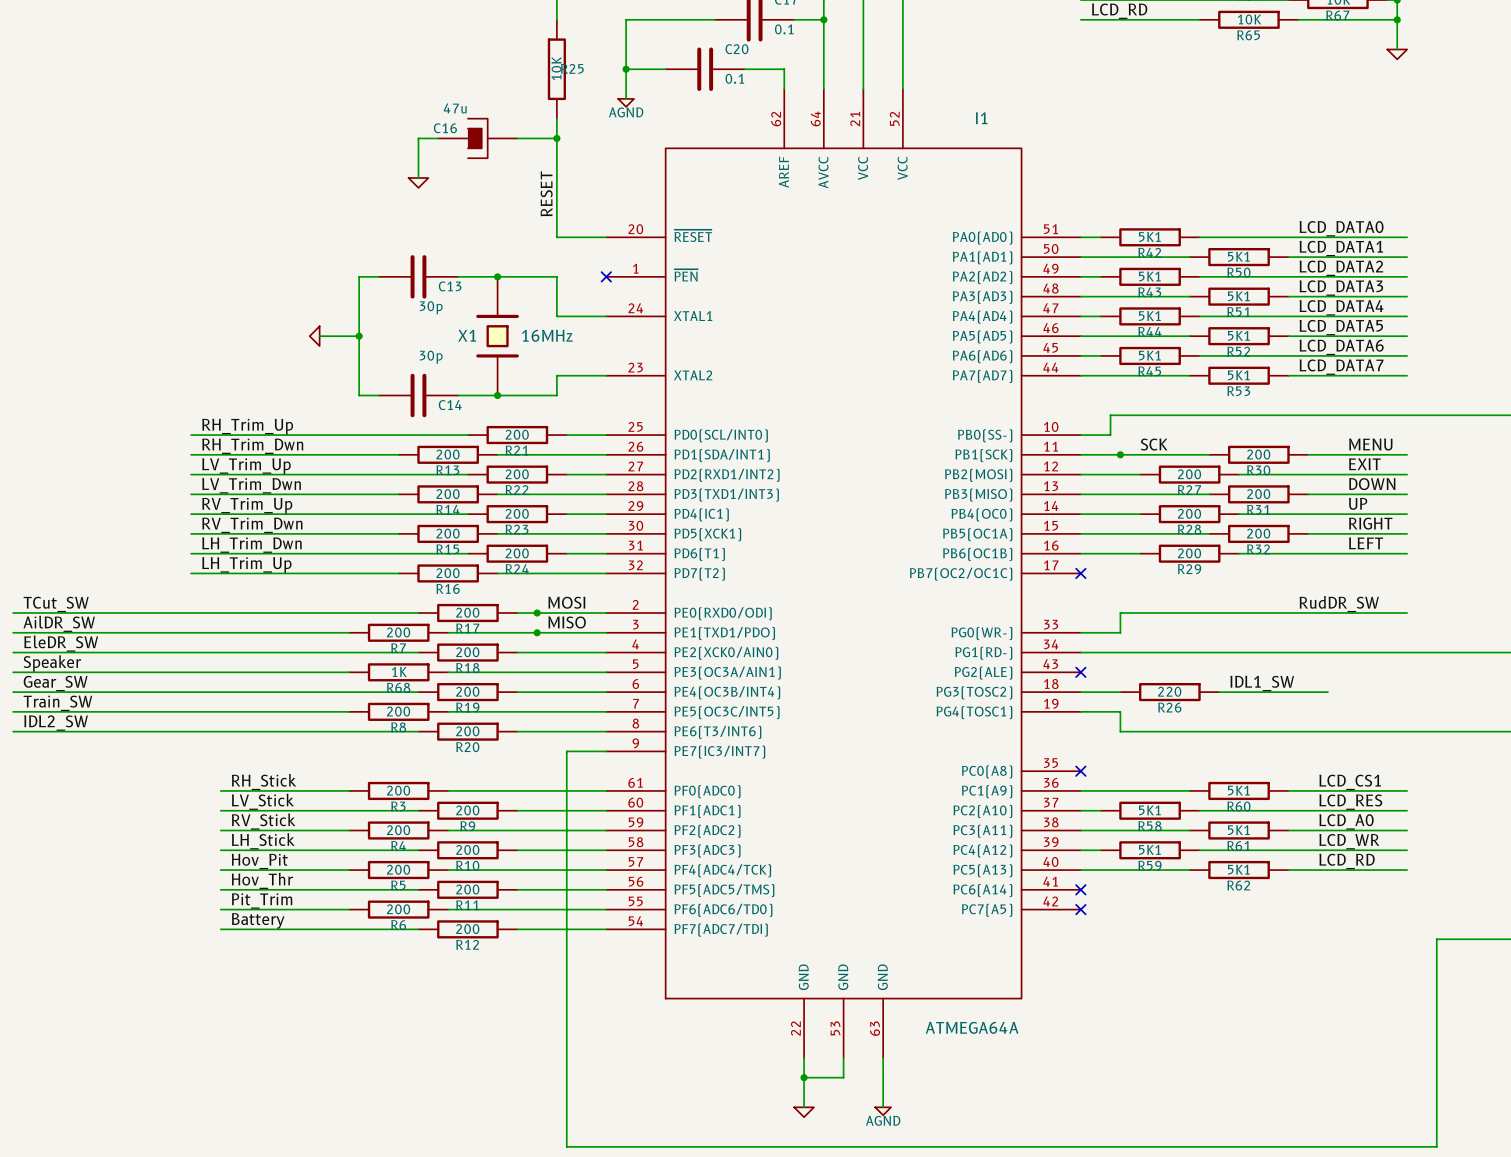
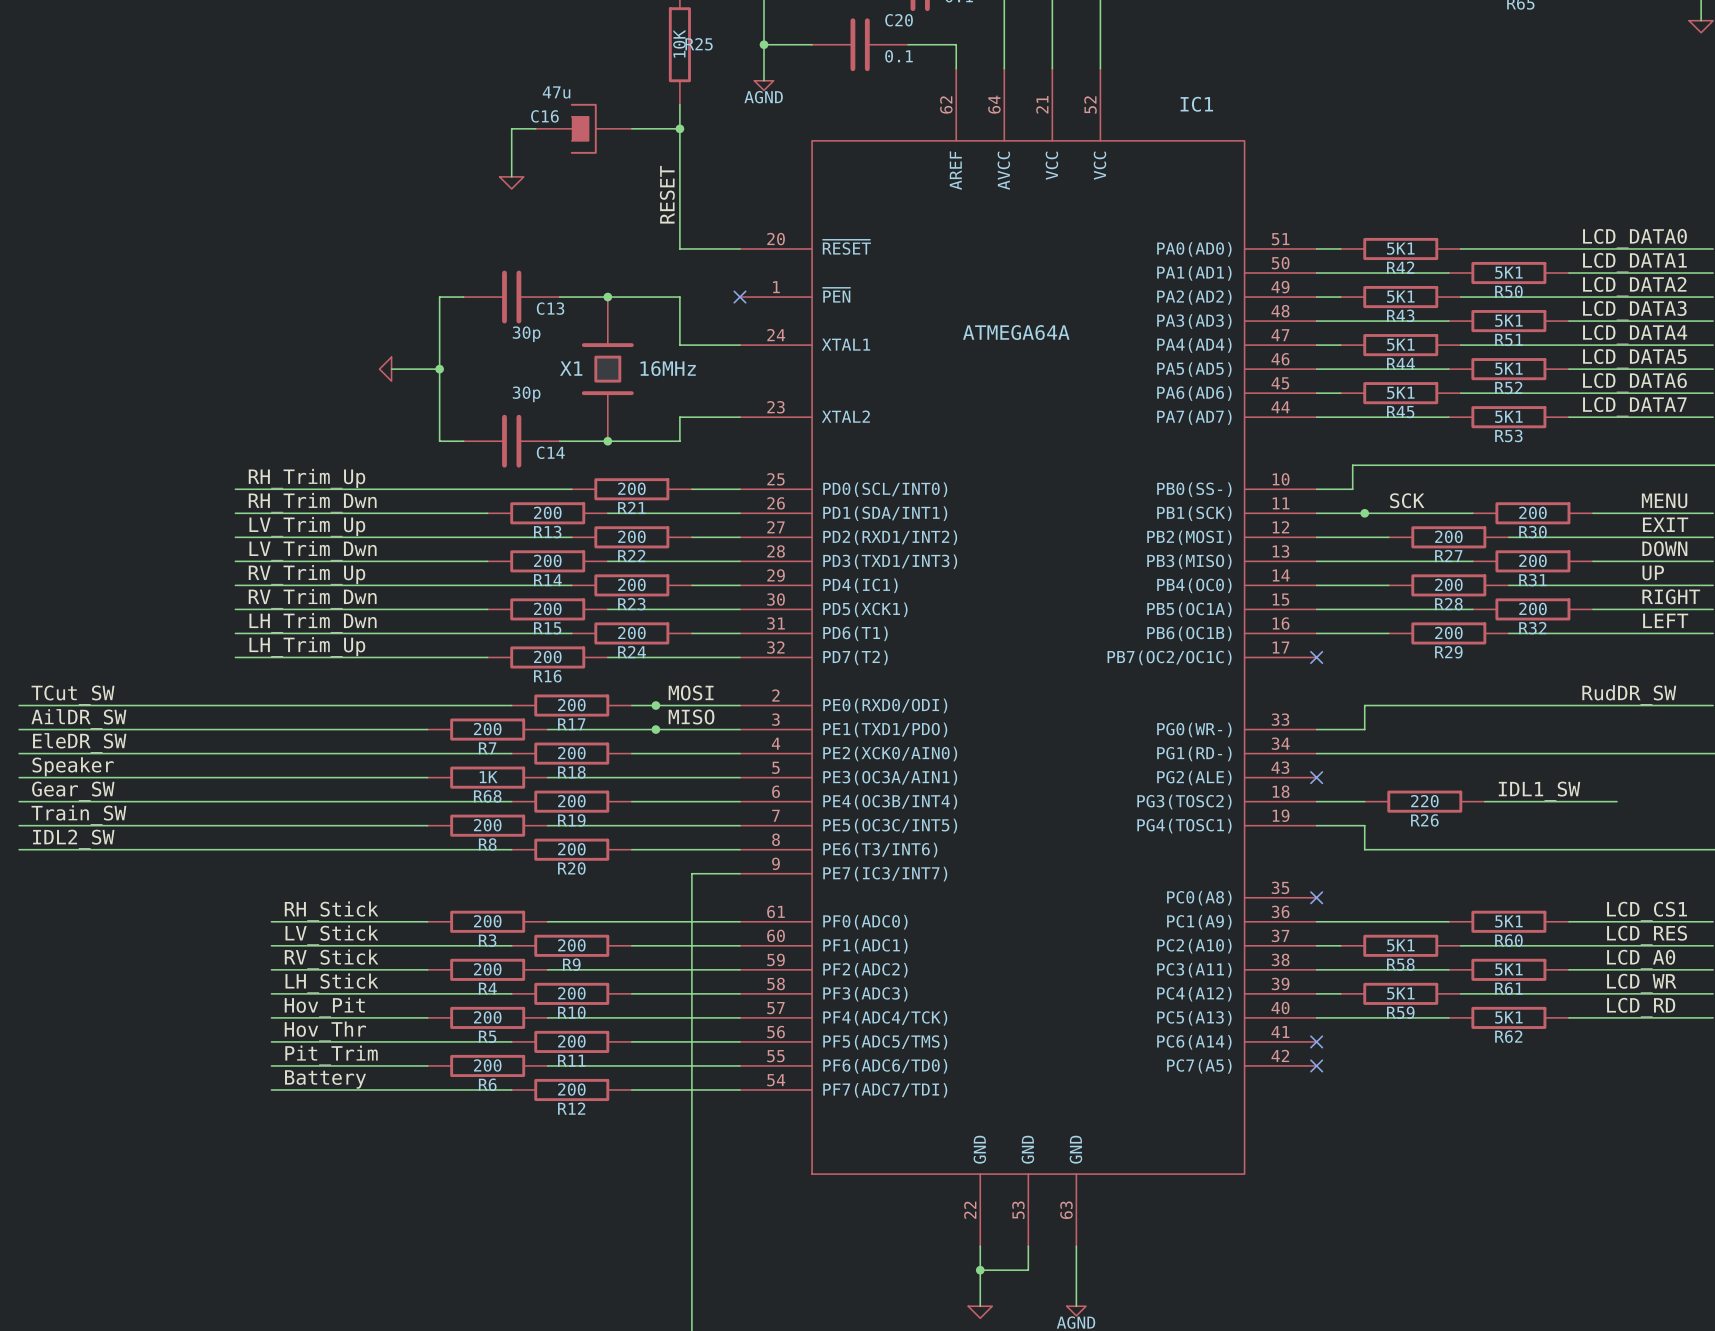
I1 name: I1 (981, 118) -> IC1 (1196, 104)
I1 value position: ATMEGA64A (972, 1027) -> ATMEGA64A (1016, 332)

